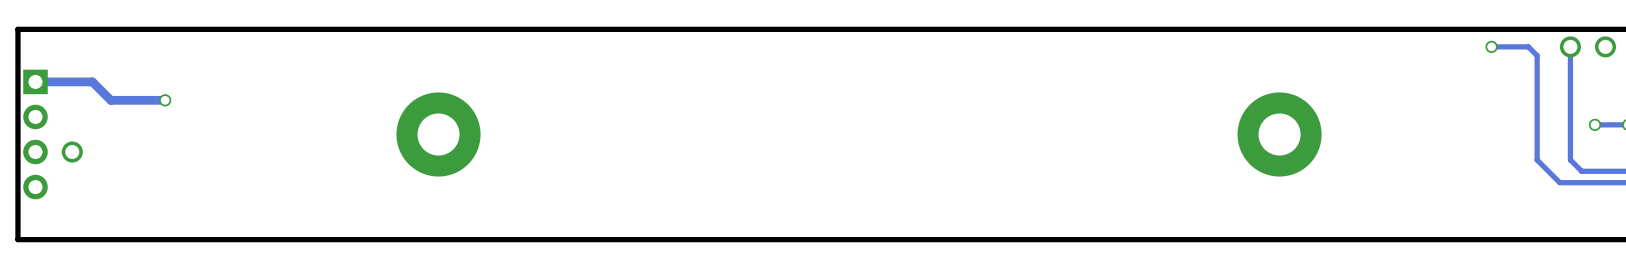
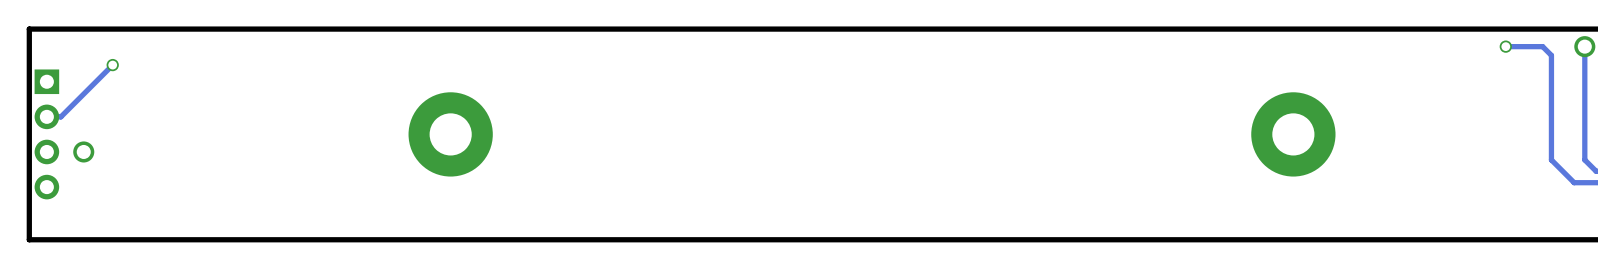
track: none -> (112, 65) (60, 116) (46, 116)
track: (35, 81) (92, 81) (110, 100) (165, 100) -> none
via position: (165, 100) -> (112, 65)

